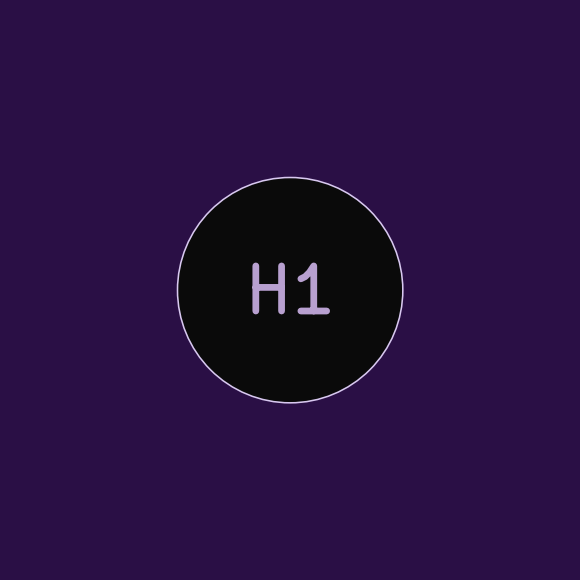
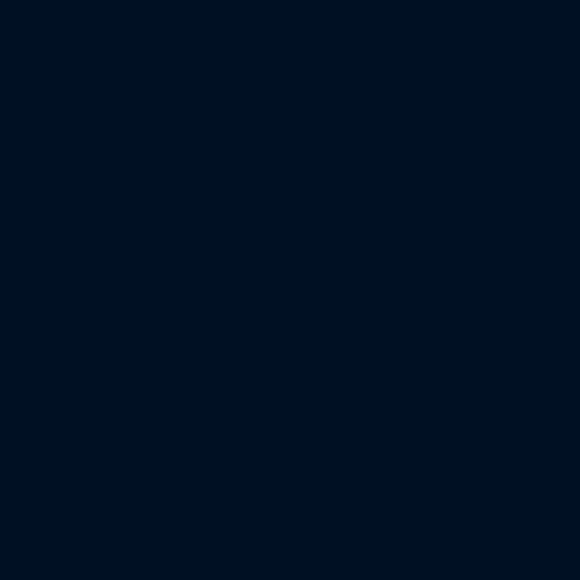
H1: (290, 290) -> none

